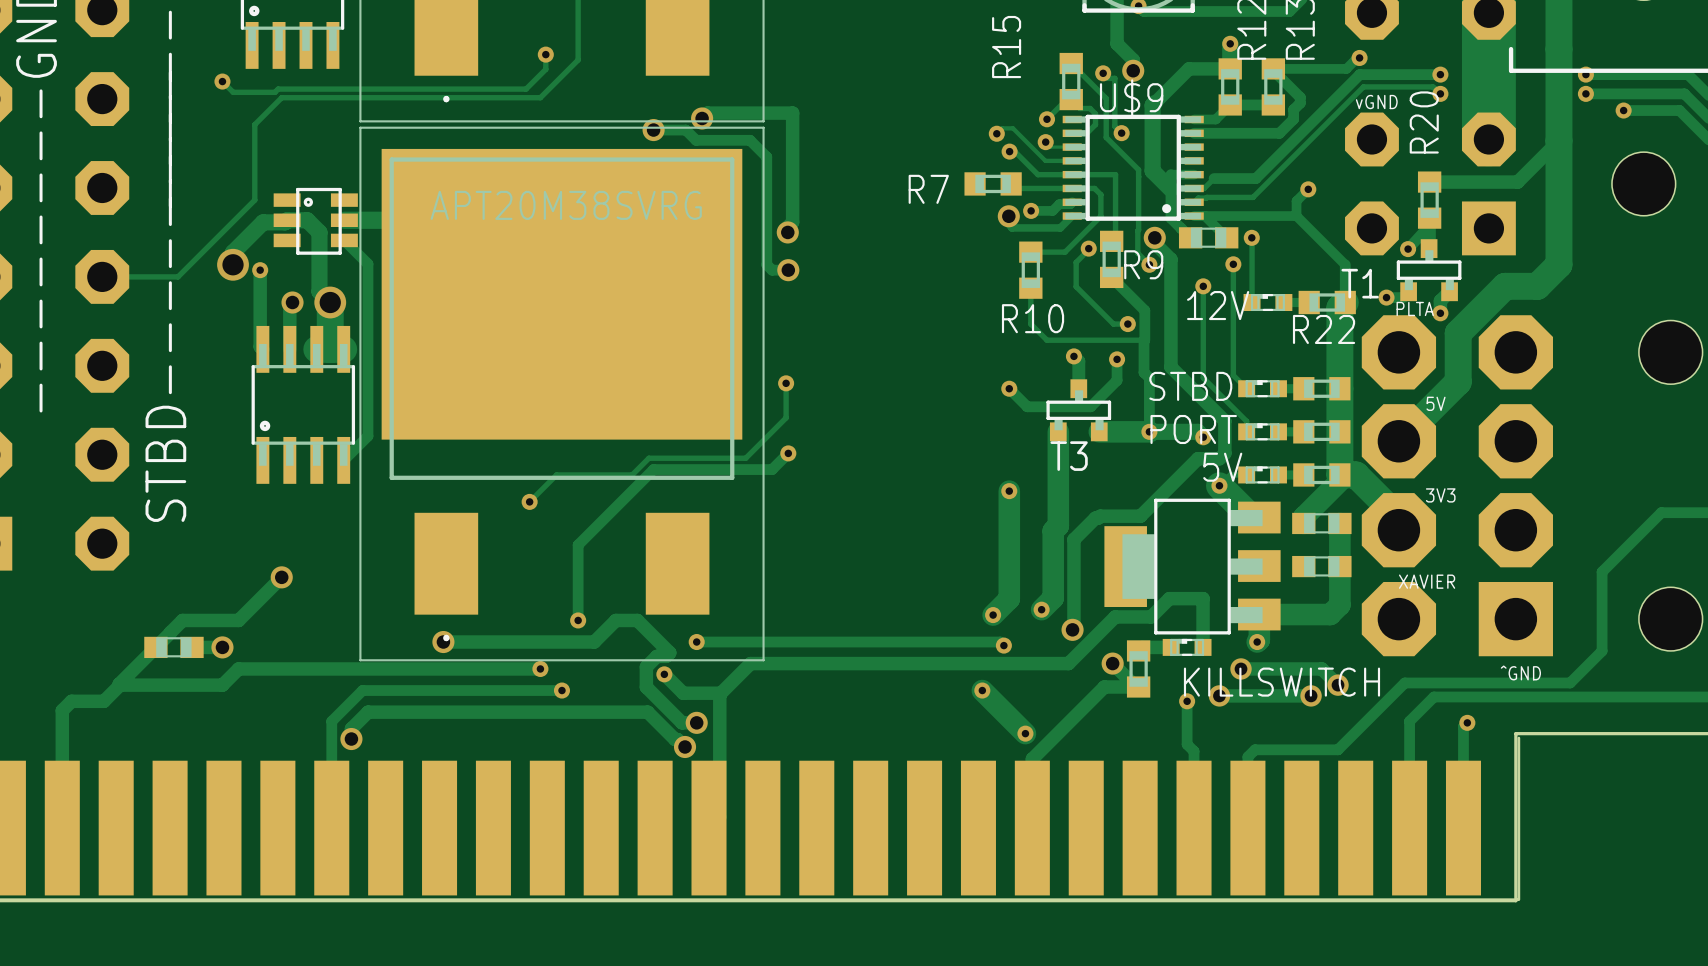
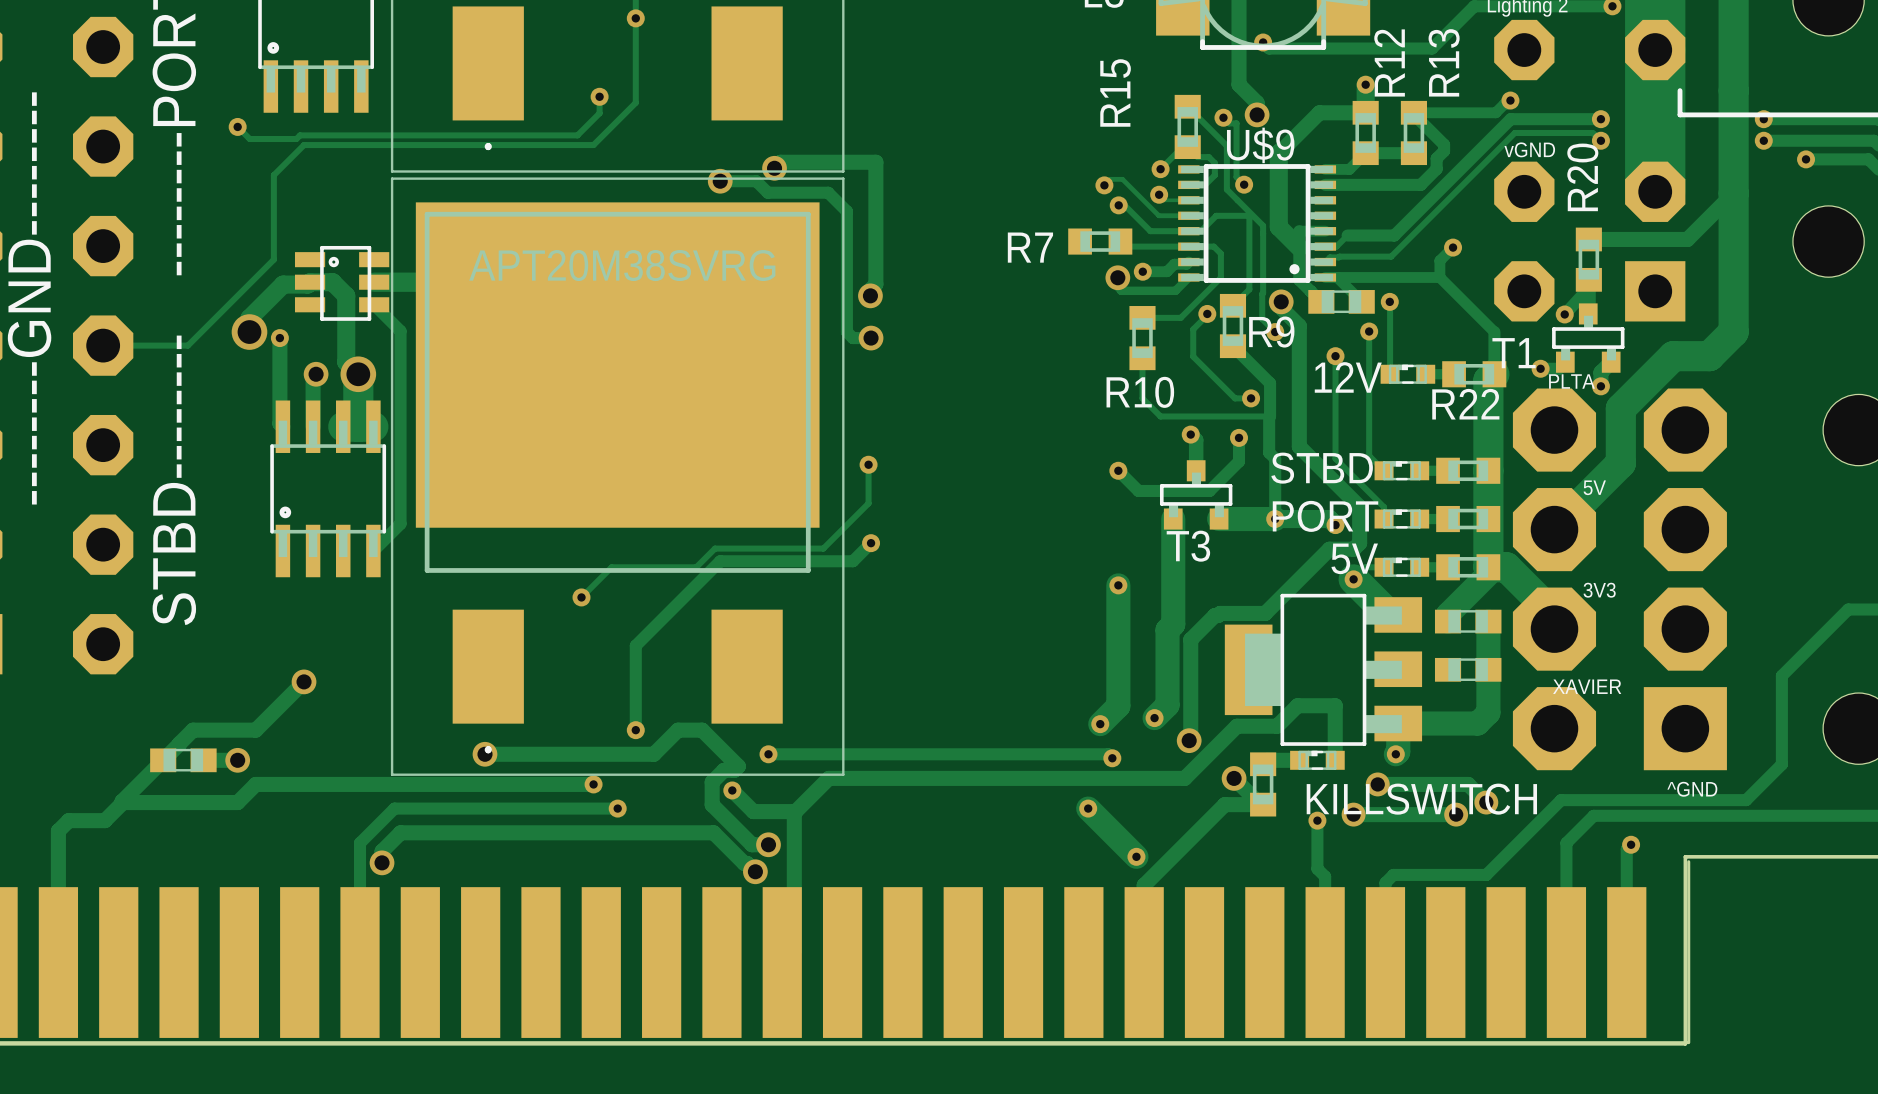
track: (1083, 174) (1115, 174) (1115, 237) -> (1200, 231) (1216, 215) (1249, 215) (1249, 289) (1237, 301)

